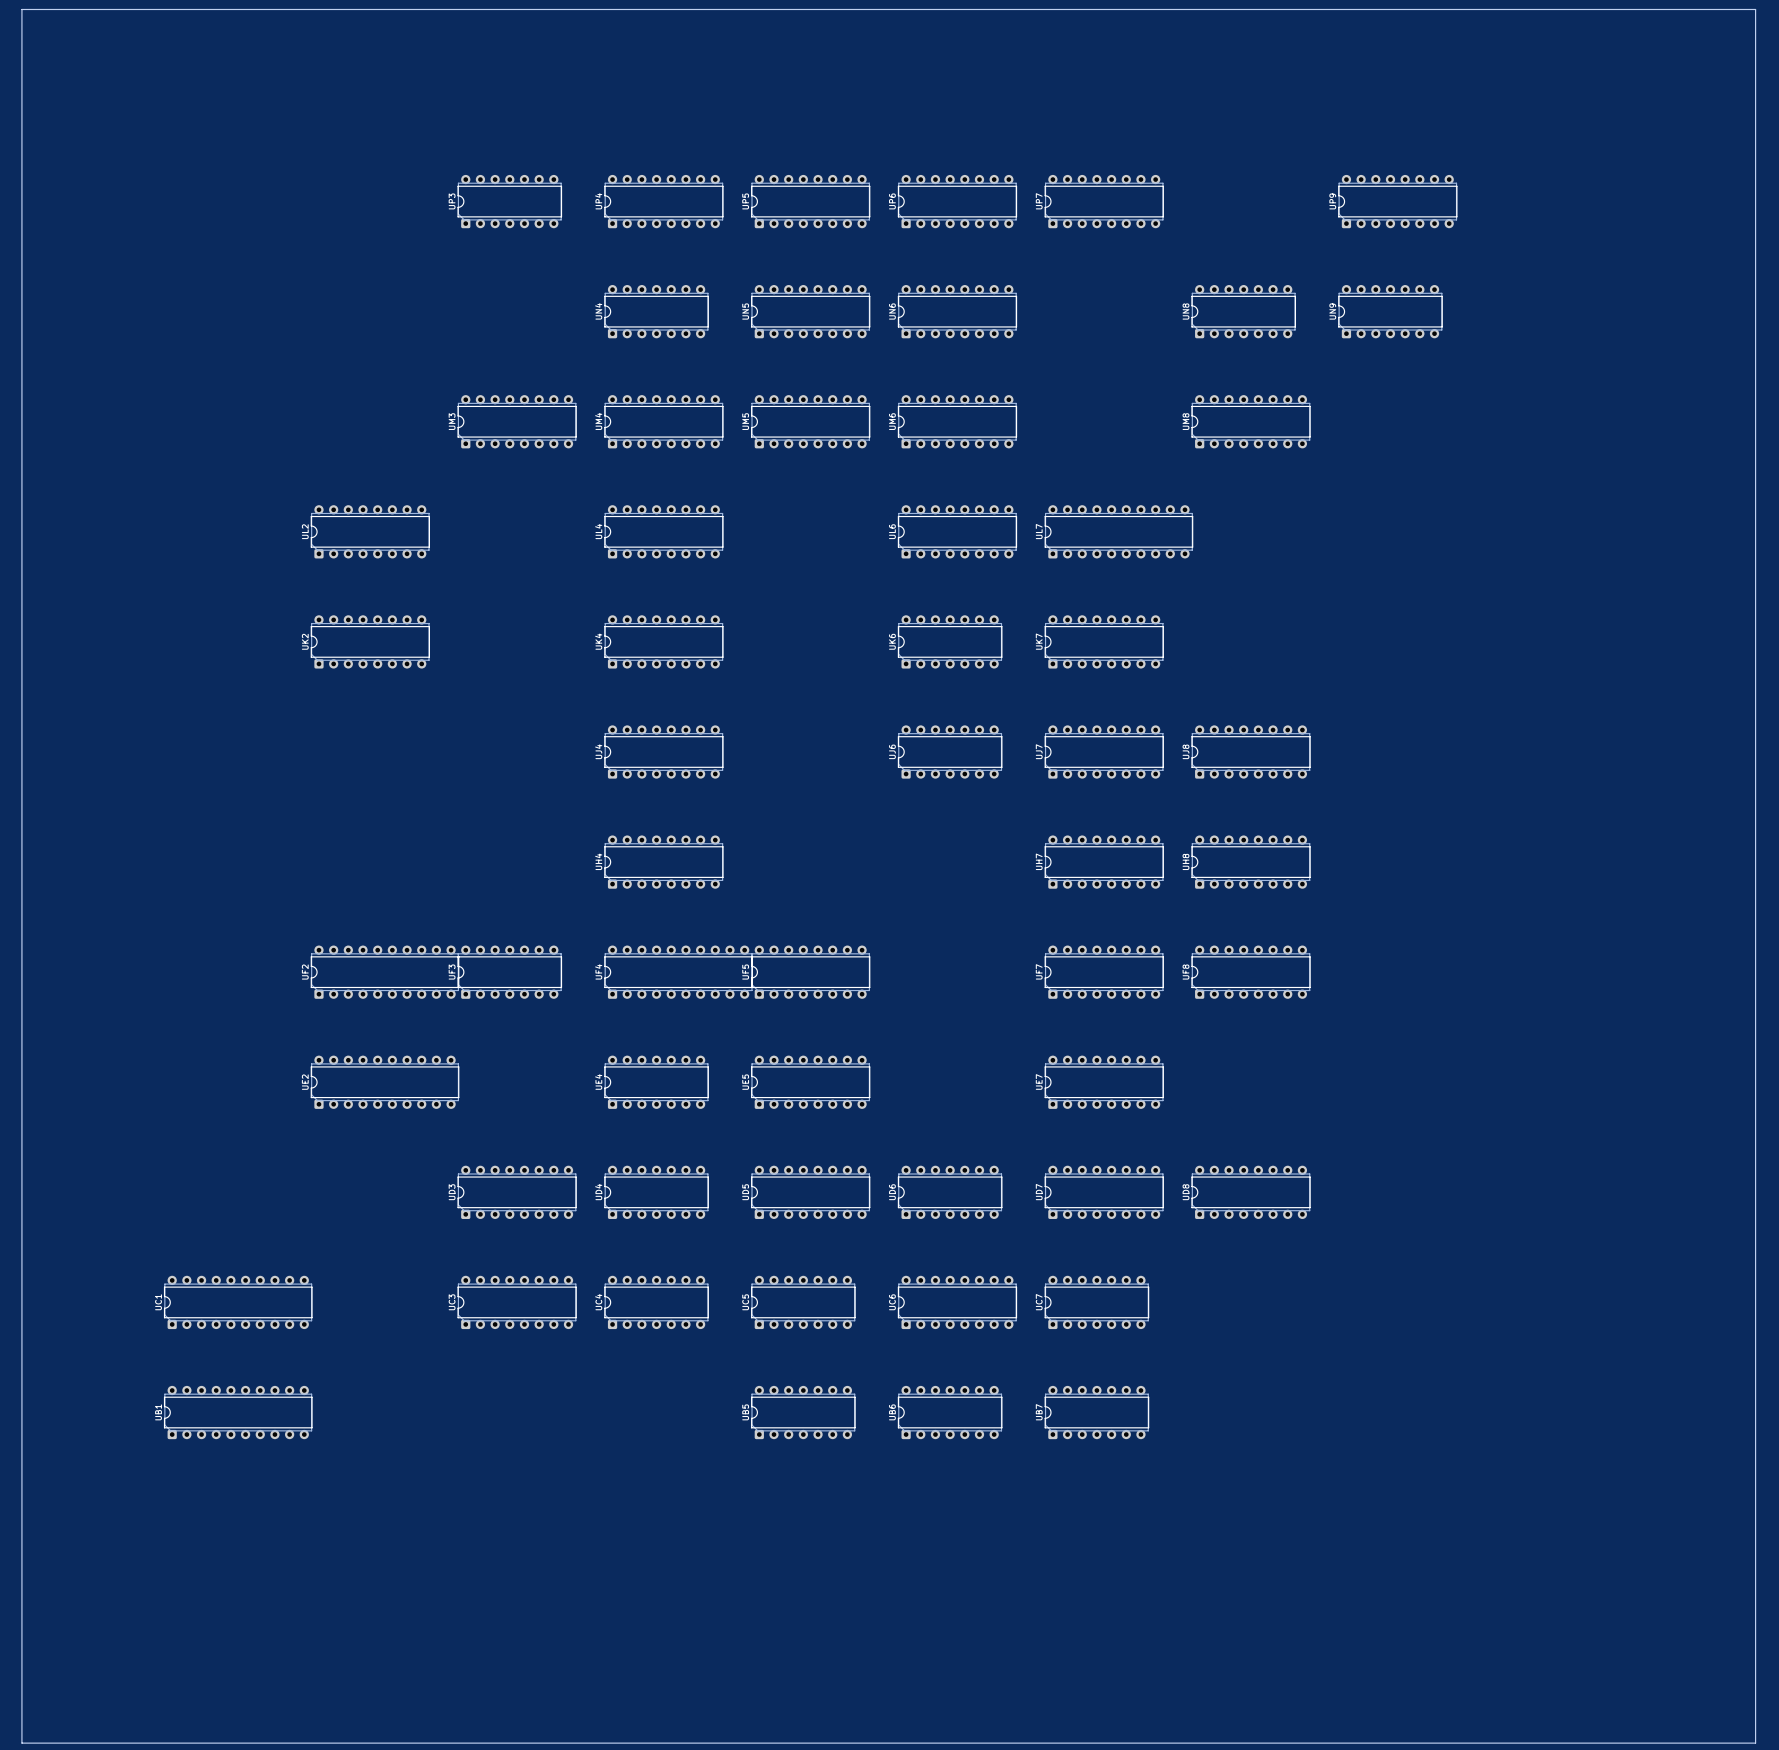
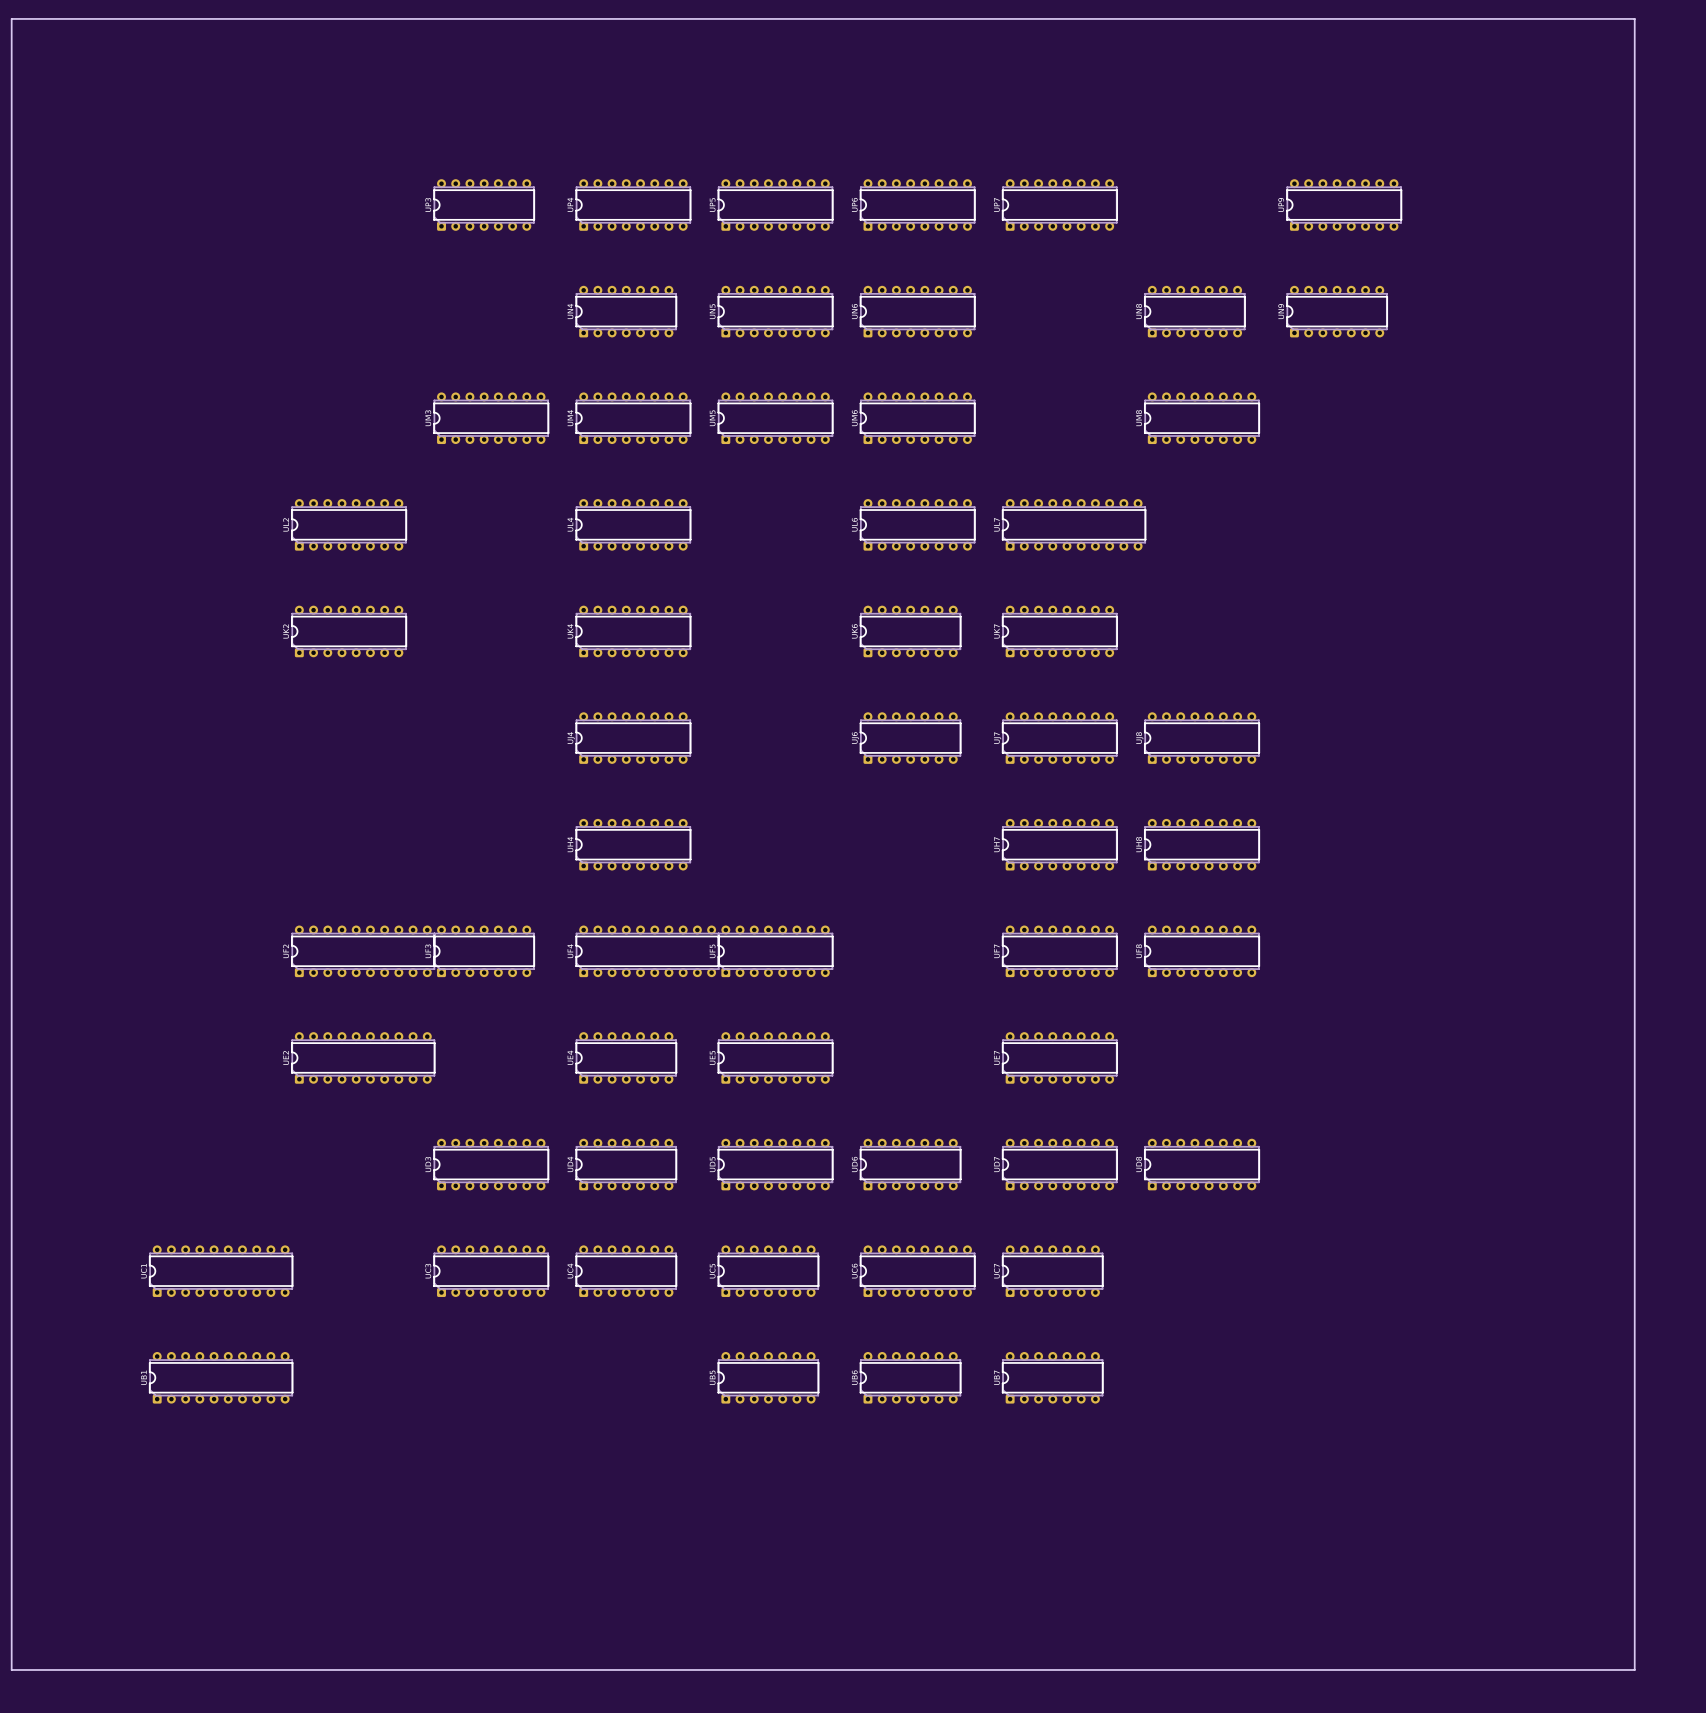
board edge: (1697, 9) (1755, 9) (1755, 1743) (21, 1743) (21, 1714) -> (1634, 18) (1634, 1669) (11, 1669)

